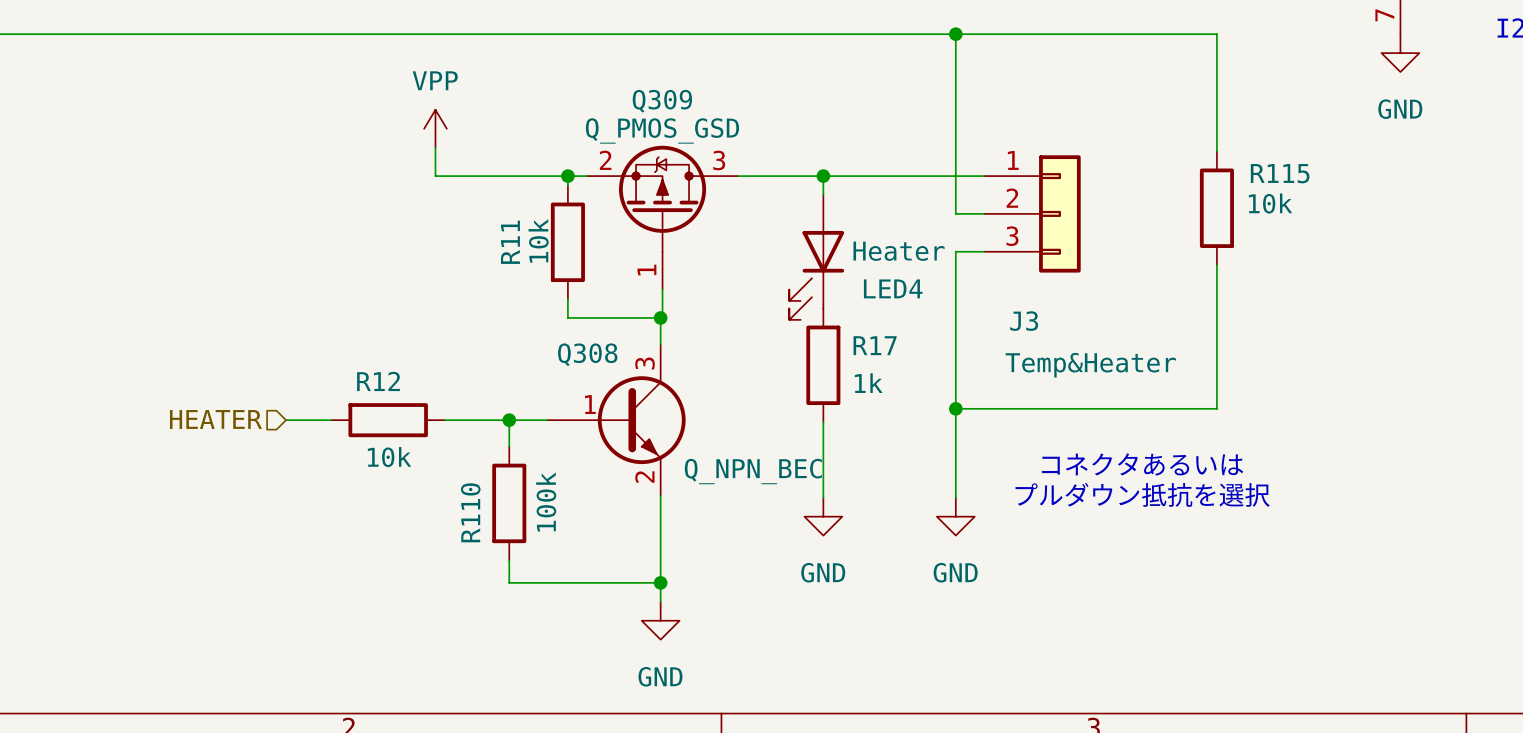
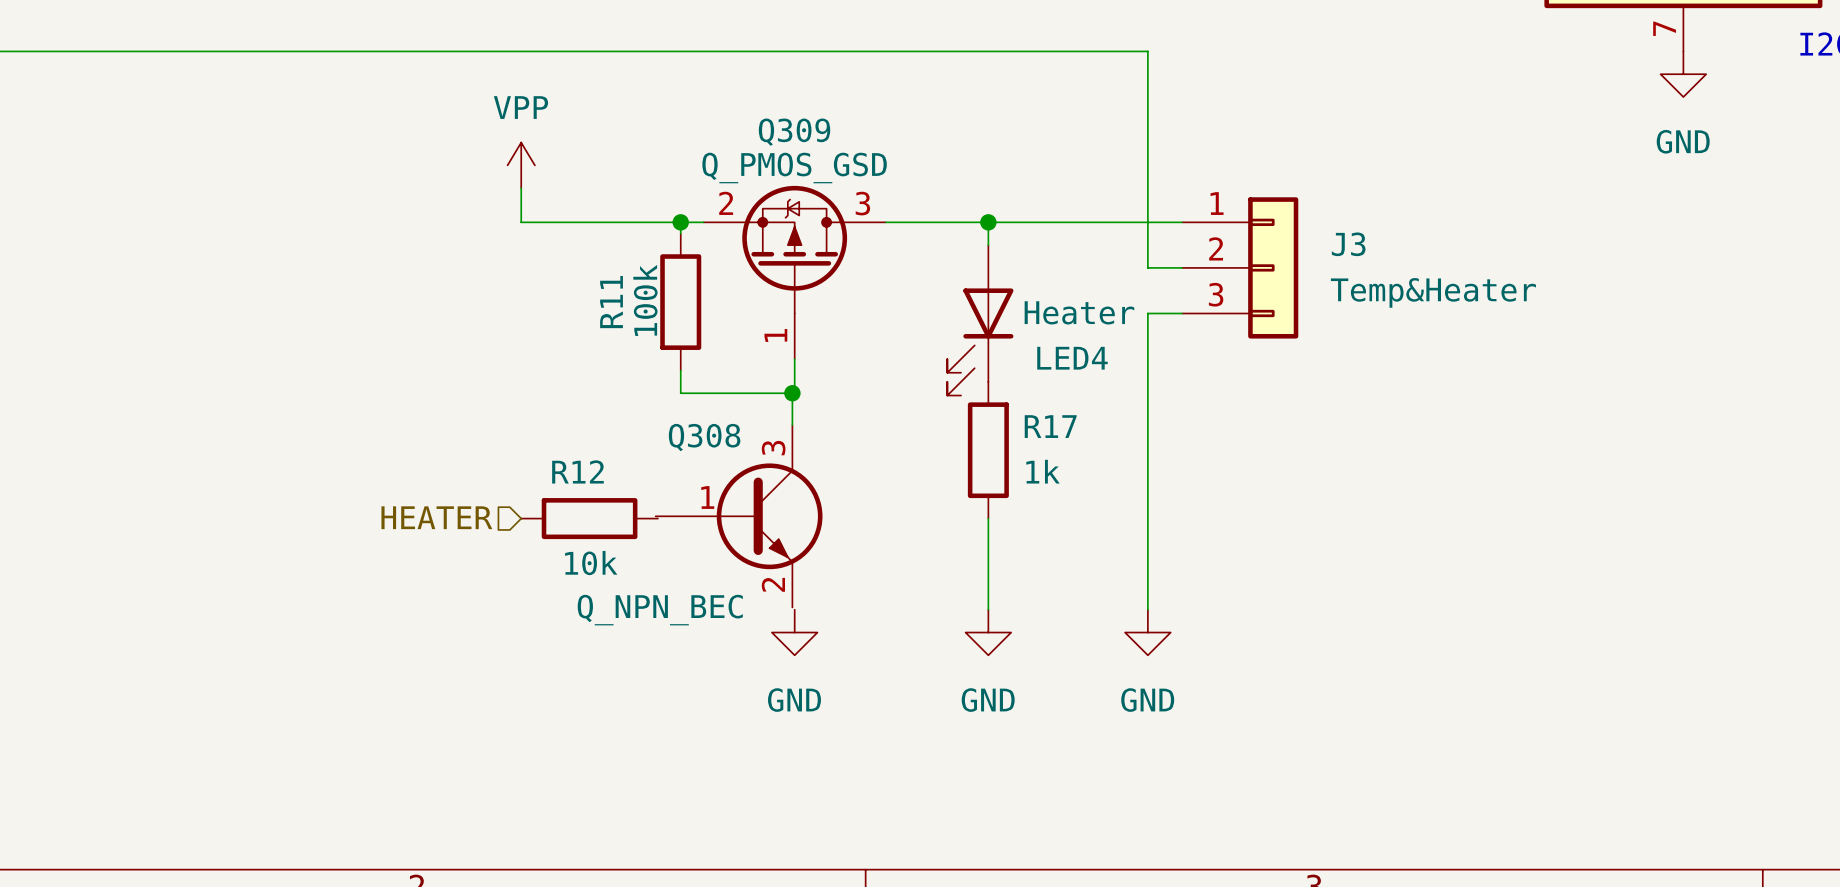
wire: (955, 34) (1216, 34) (1216, 151) -> none
junction: (955, 34) -> none
R115: 10k (1216, 208) -> none
R11 value: 10k (538, 240) -> 100k (645, 300)
wire: (1216, 265) (1216, 408) (955, 408) -> none
J3 name position: J3 (1024, 321) -> J3 (1348, 244)
J3 value position: Temp&Heater (1090, 365) -> Temp&Heater (1433, 292)
junction: (955, 408) -> none
hierarchical label position: HEATER (215, 419) -> HEATER (436, 517)
wire: (286, 420) (331, 420) -> none
R12 position: (388, 420) -> (589, 518)
wire: (444, 420) (547, 420) -> none
wire: (509, 420) (509, 446) -> none
junction: (509, 420) -> none
text: コネクタあるいは (1142, 464) -> none
Q308 value position: Q_NPN_BEC (753, 471) -> Q_NPN_BEC (660, 610)
text: プルダウン抵抗を選択 (1142, 494) -> none
wire: (660, 495) (660, 601) -> none
R110: 100k (509, 503) -> none
wire: (509, 560) (509, 582) (660, 582) -> none
junction: (660, 582) -> none
power symbol position: GND (660, 620) -> GND (794, 632)

